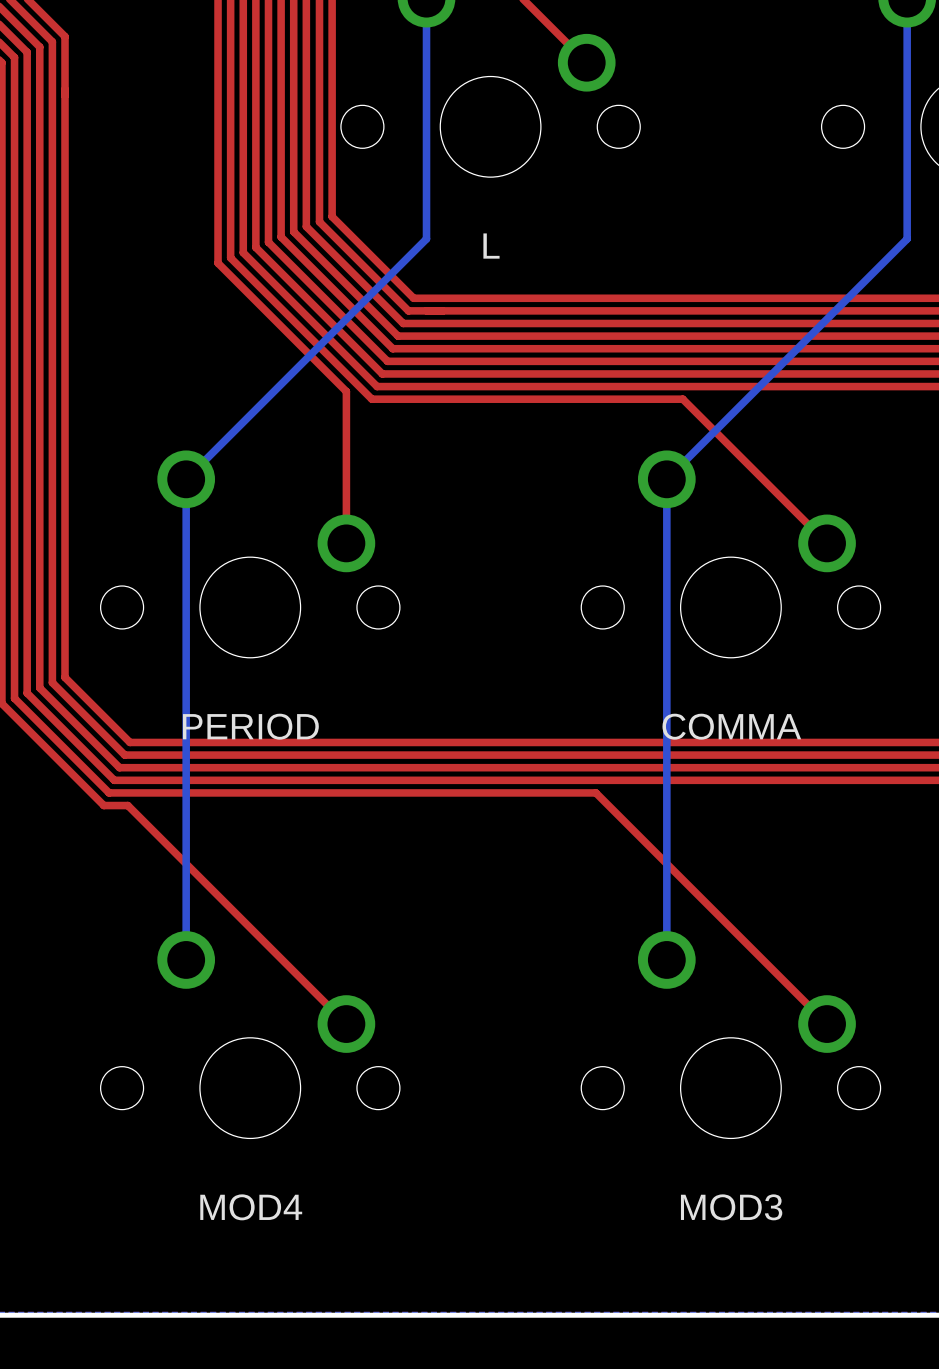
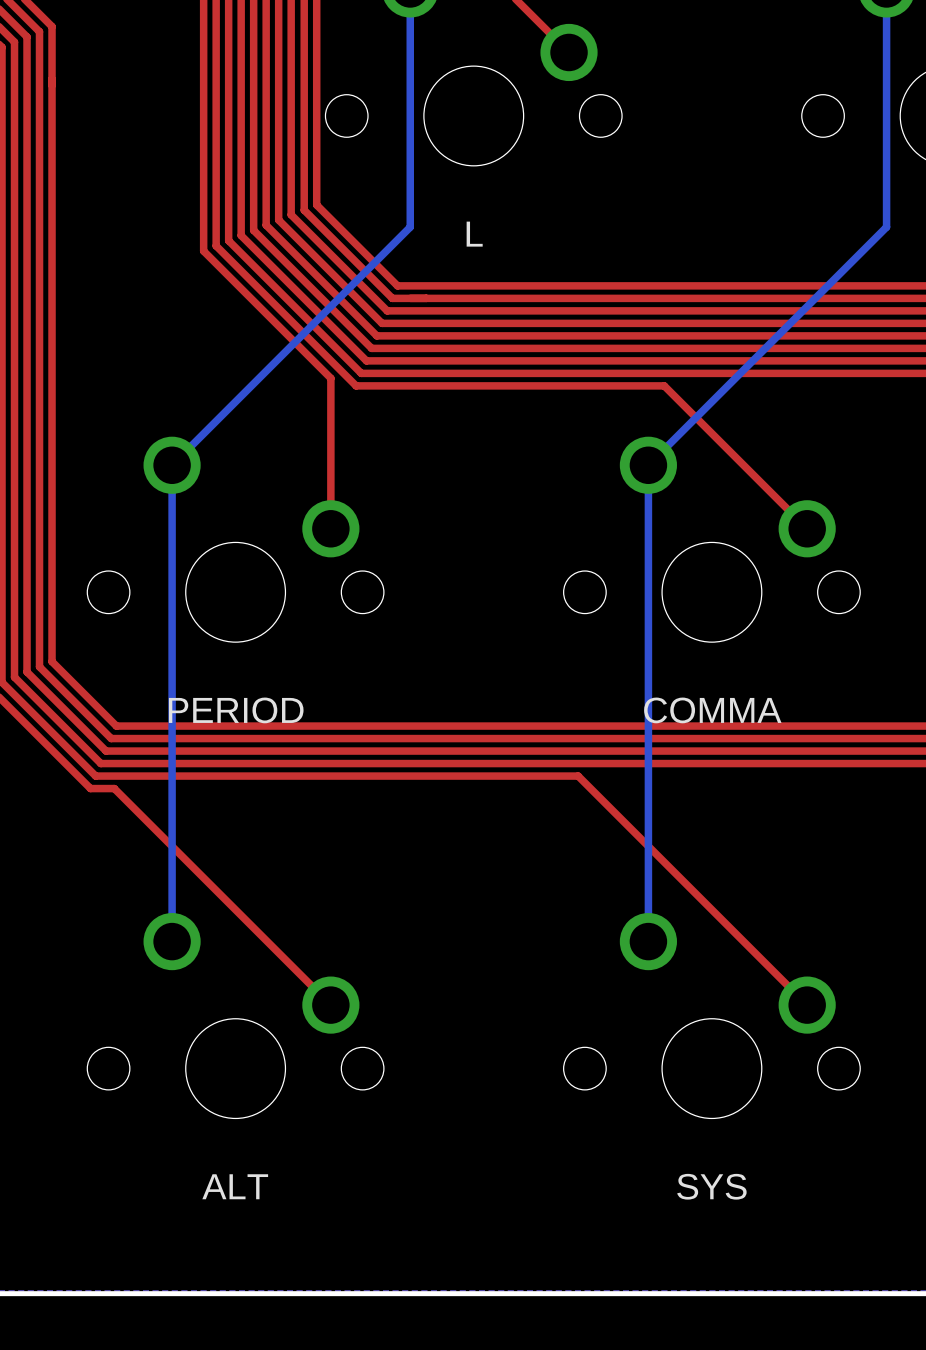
text: MOD4 (251, 1207) -> ALT (235, 1186)
text: MOD3 (731, 1207) -> SYS (711, 1186)

